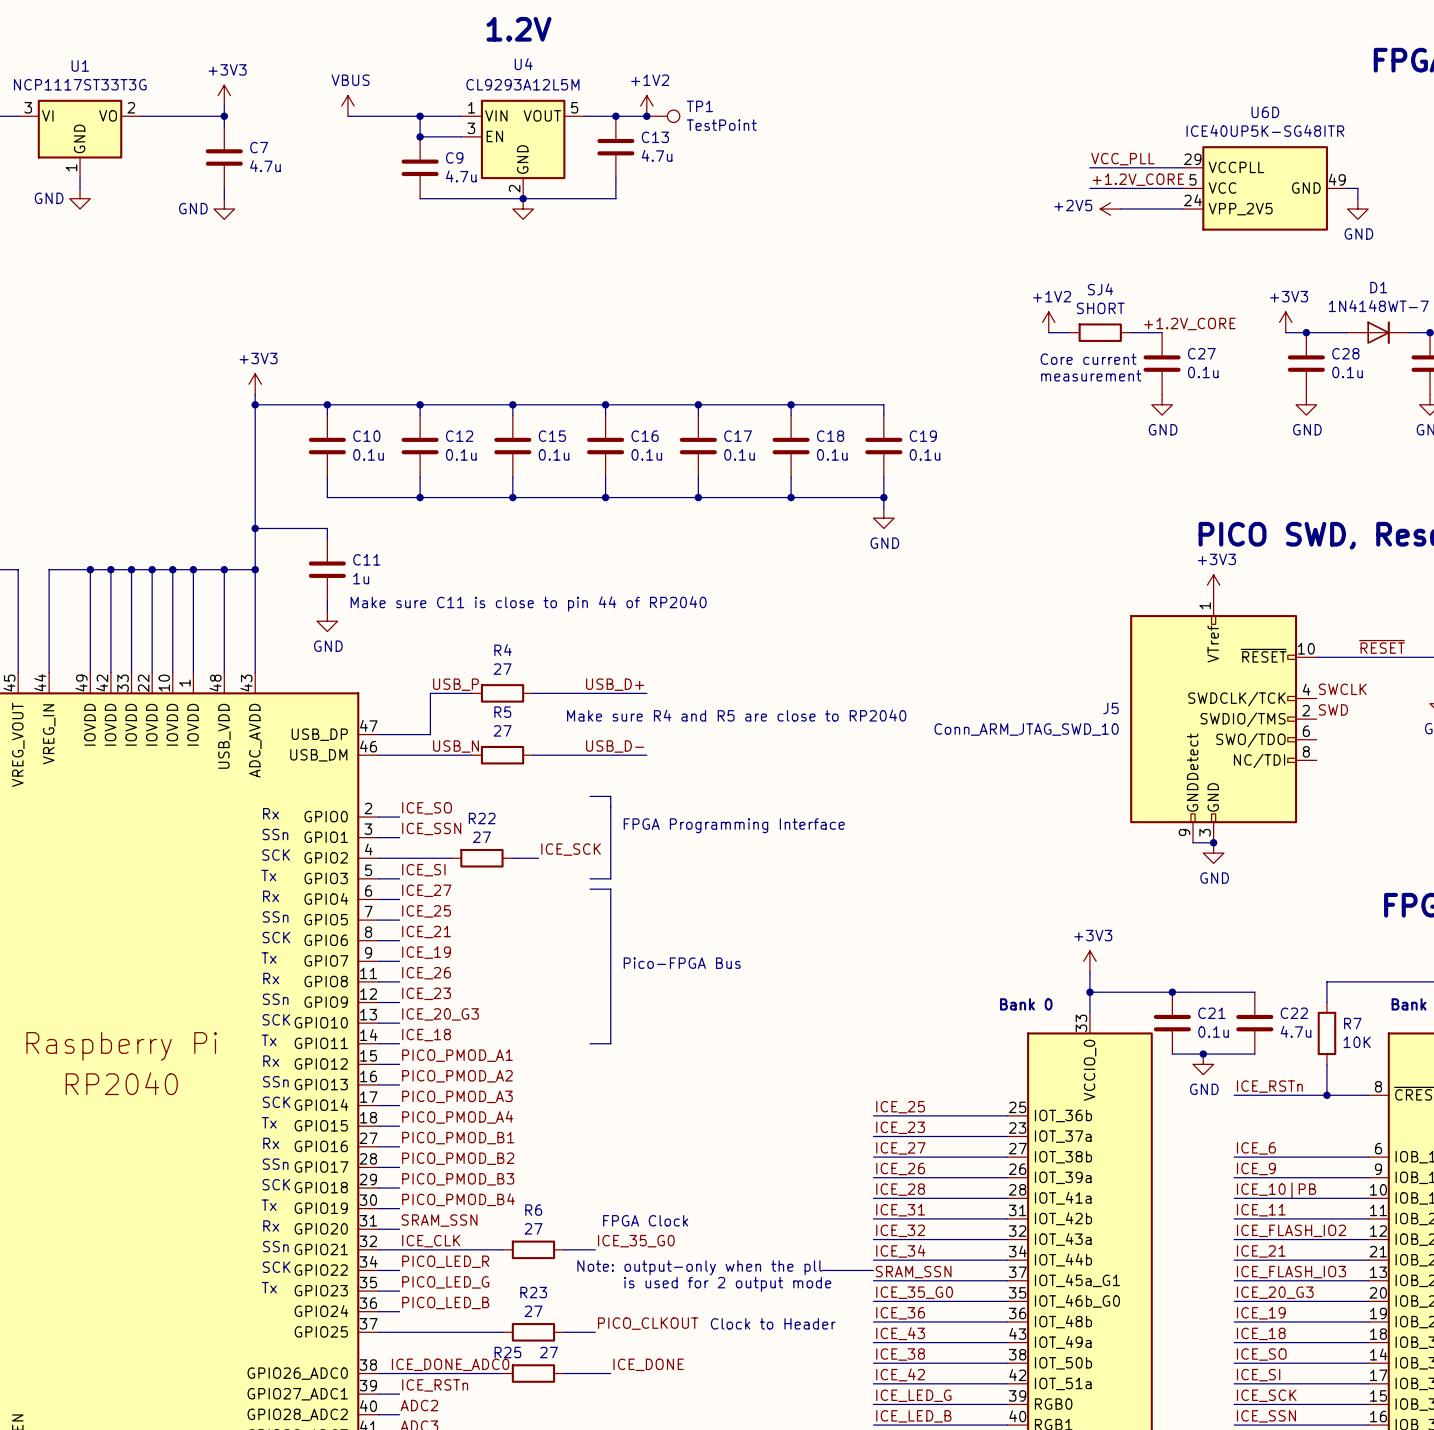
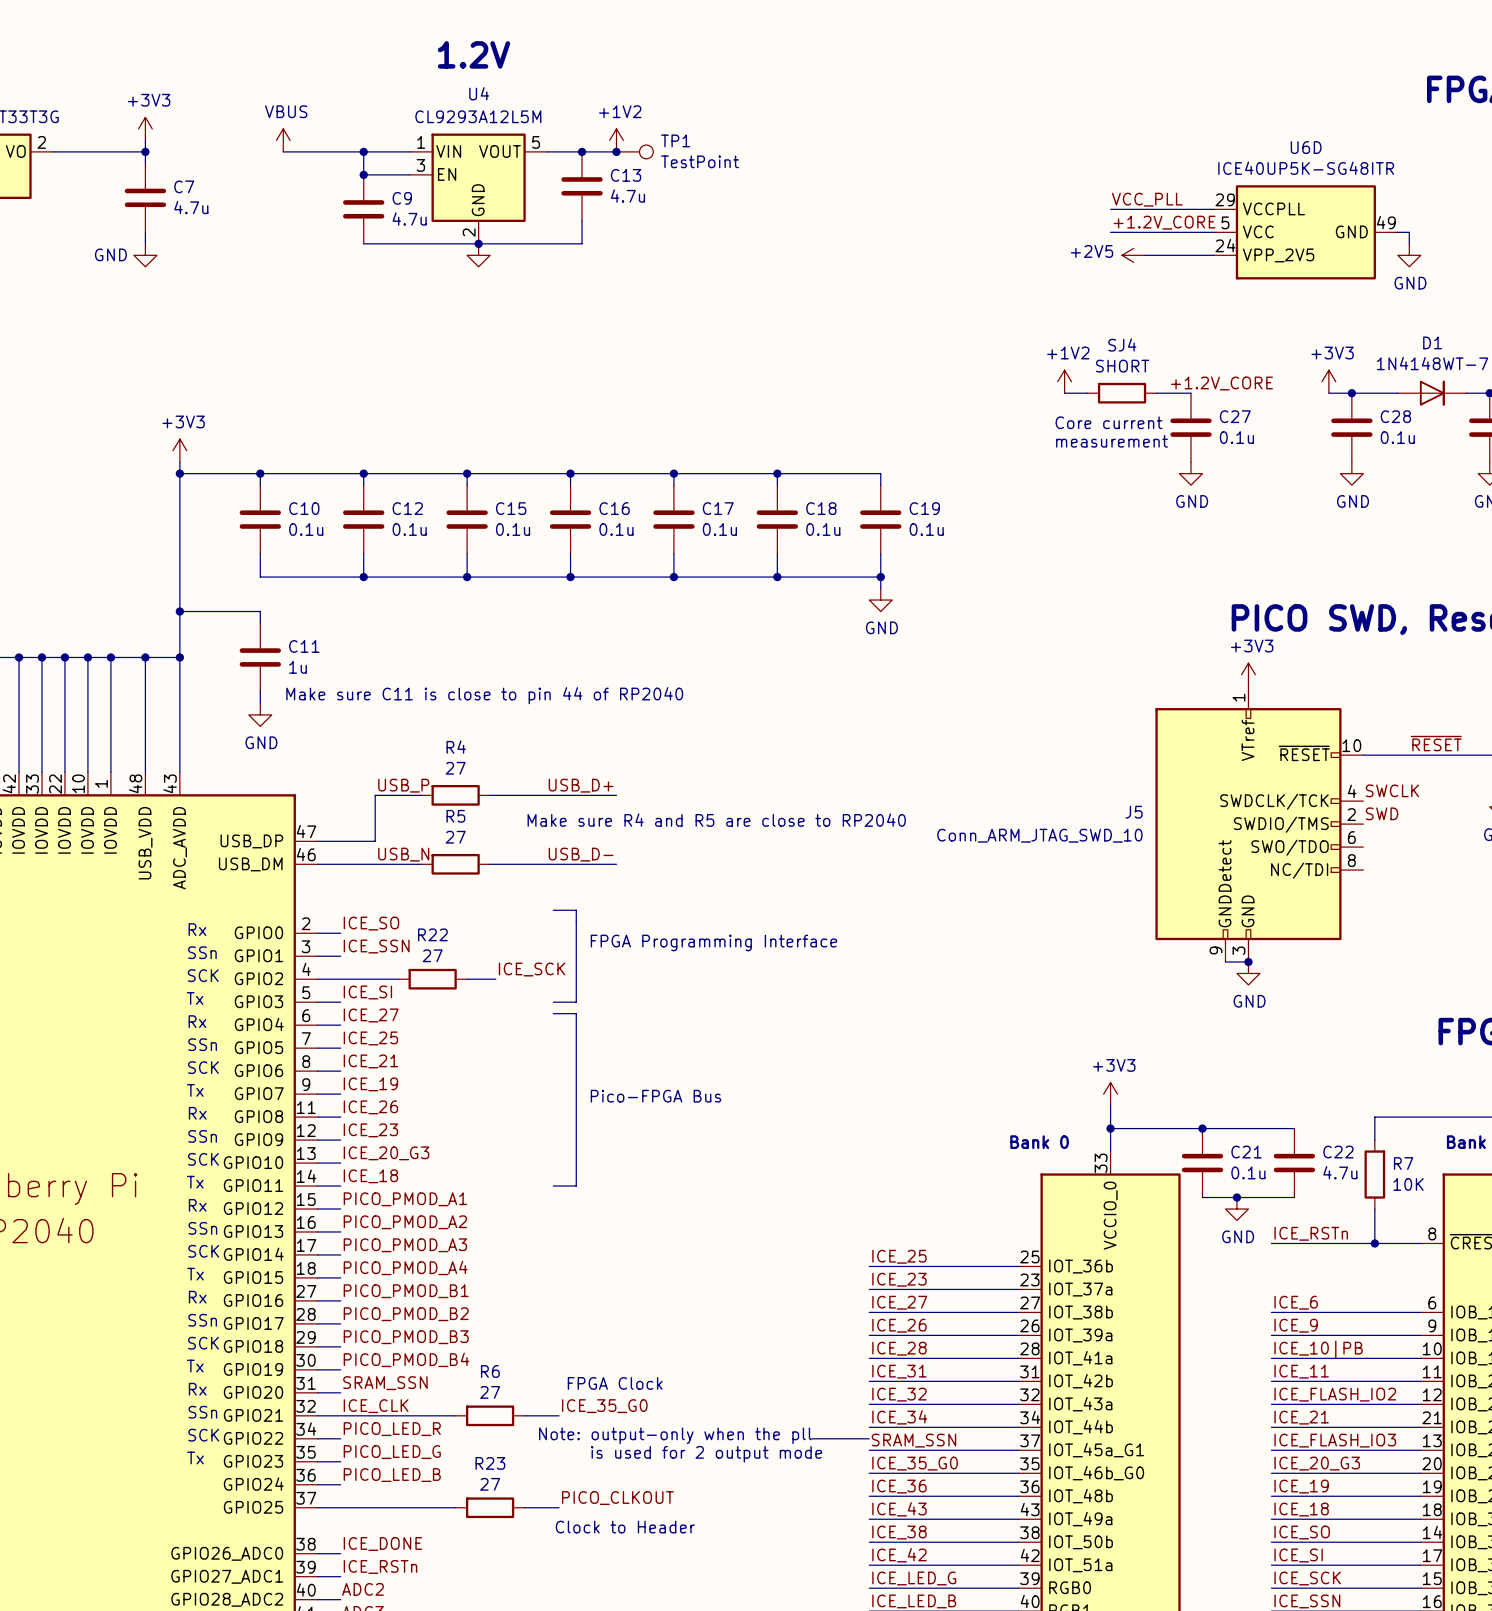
text position: Clock to Header (773, 1323) -> Clock to Header (625, 1527)
label: ICE_DONE_ADC0 (450, 1364) -> ICE_DONE (382, 1544)
label: ICE_DONE (648, 1364) -> none
wire: (399, 1373) (502, 1373) -> none
R25: 27 (533, 1373) -> none
wire: (564, 1373) (610, 1373) -> none

